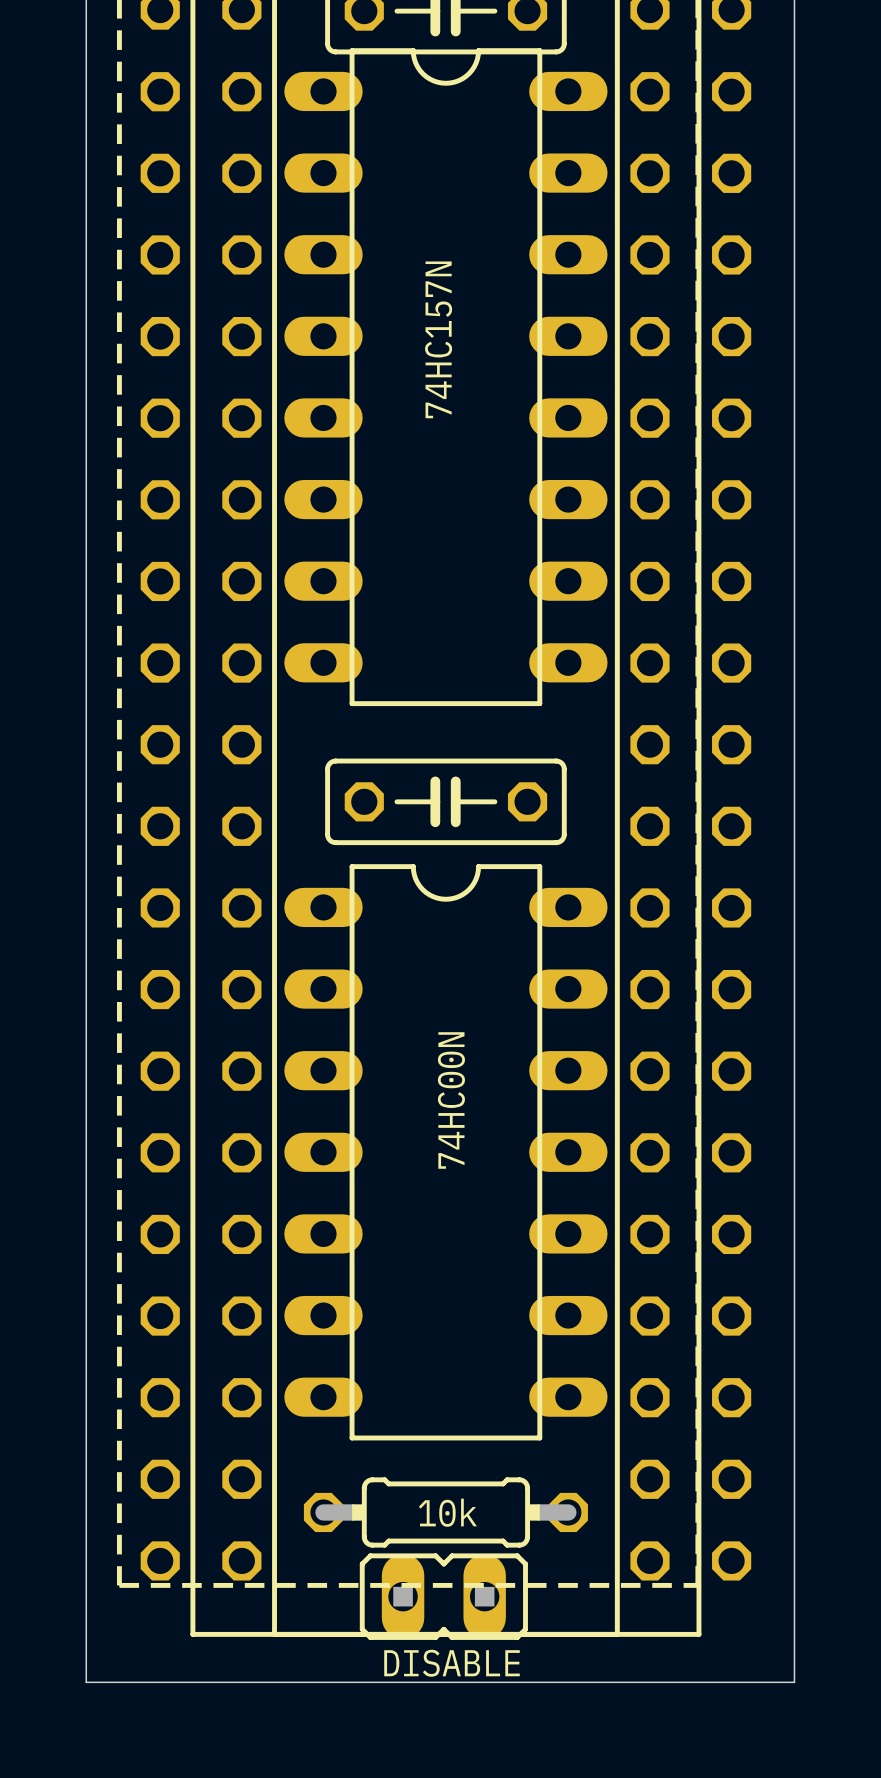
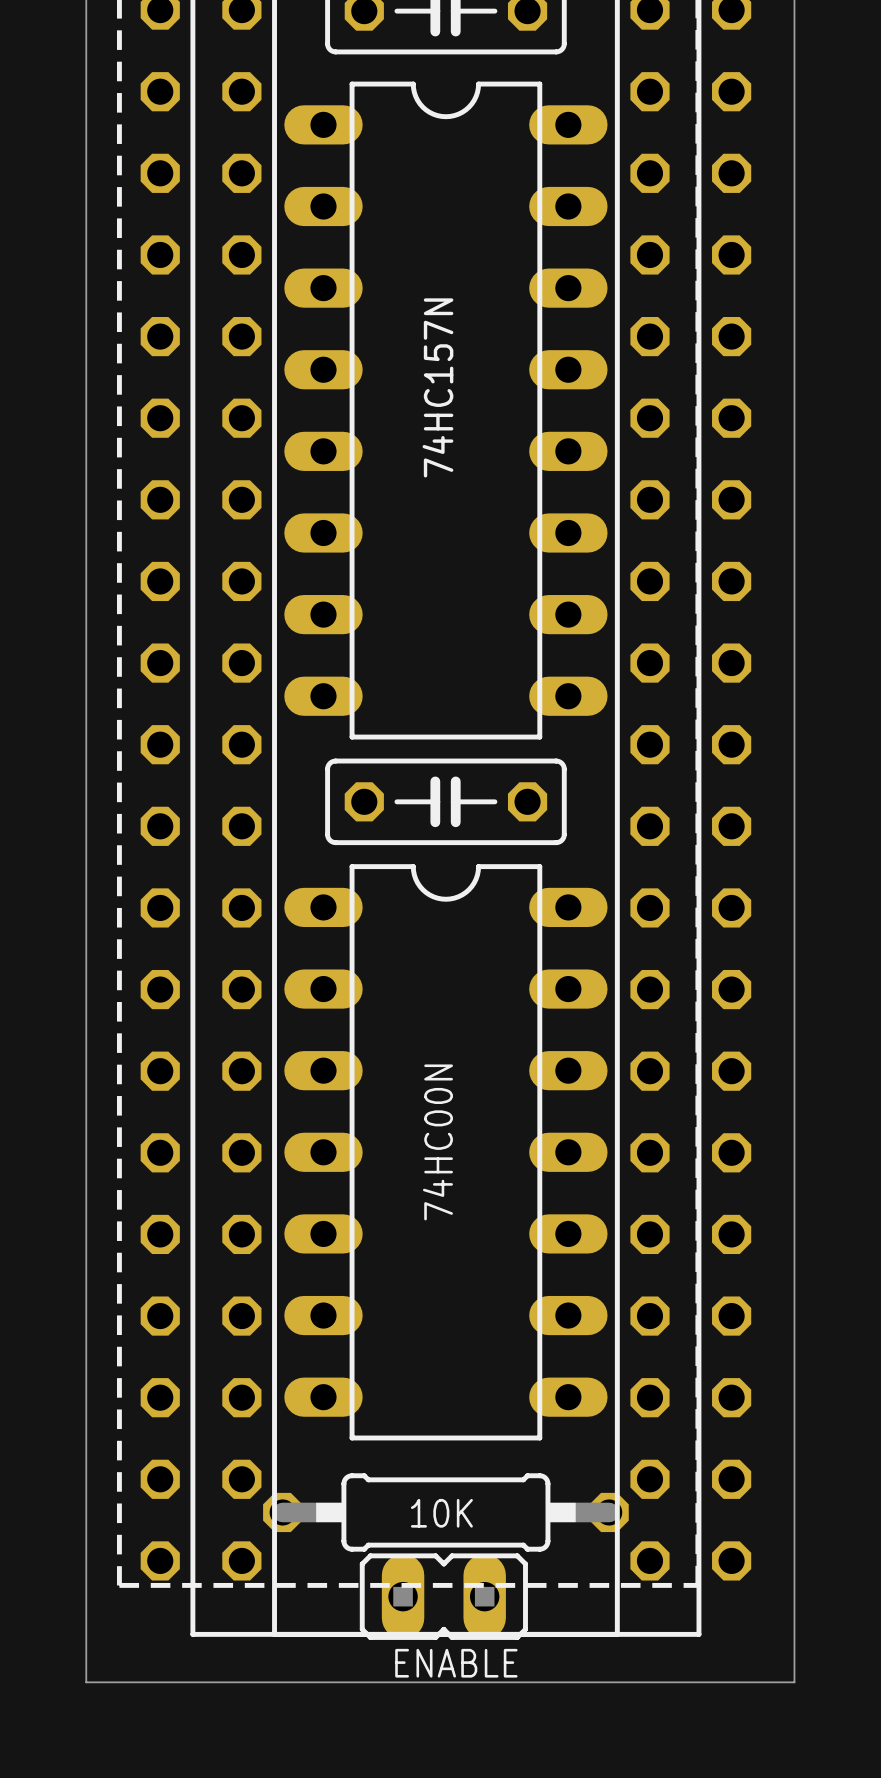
part position: (445, 377) -> (445, 410)
part value position: 74HC00N (451, 1100) -> 74HC00N (437, 1142)
part footprint: [303, 1477, 588, 1548] -> [263, 1473, 629, 1552]
part value: 10k (447, 1512) -> 10K (441, 1513)
DISABLE name: DISABLE (452, 1663) -> ENABLE (456, 1663)

